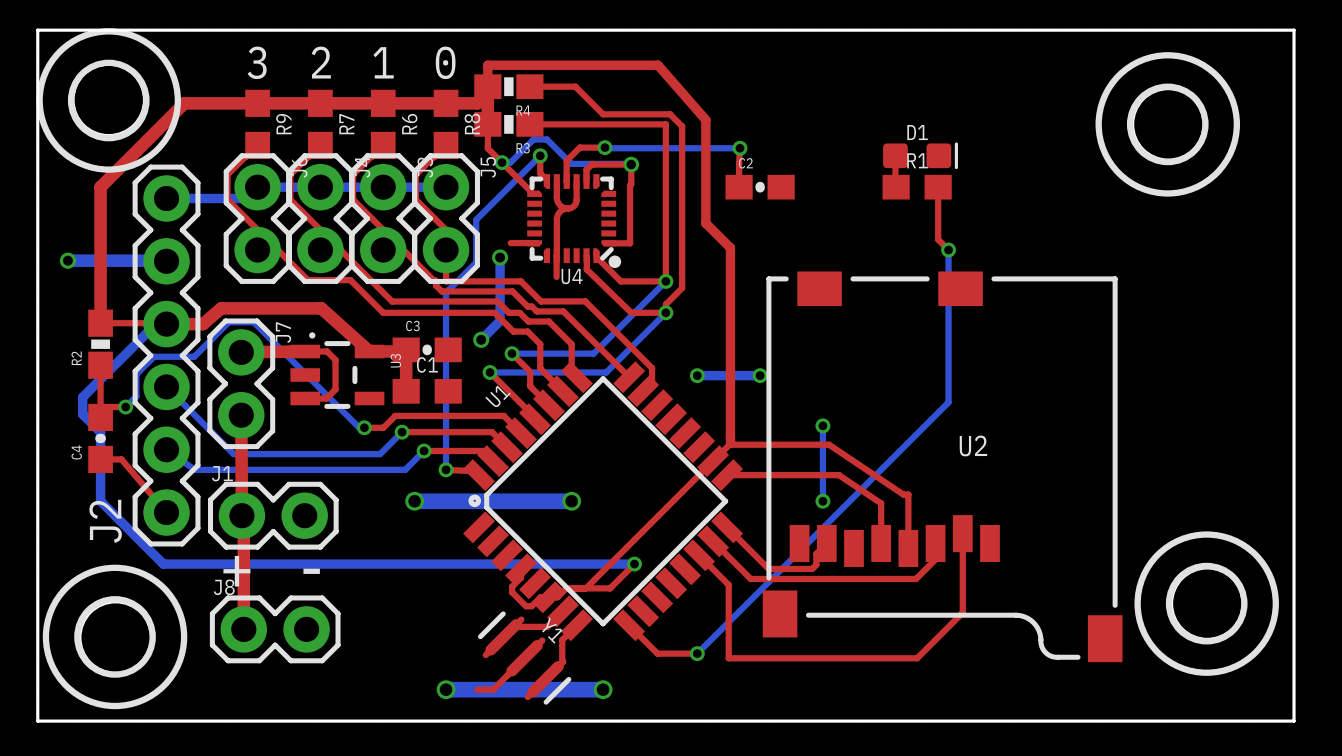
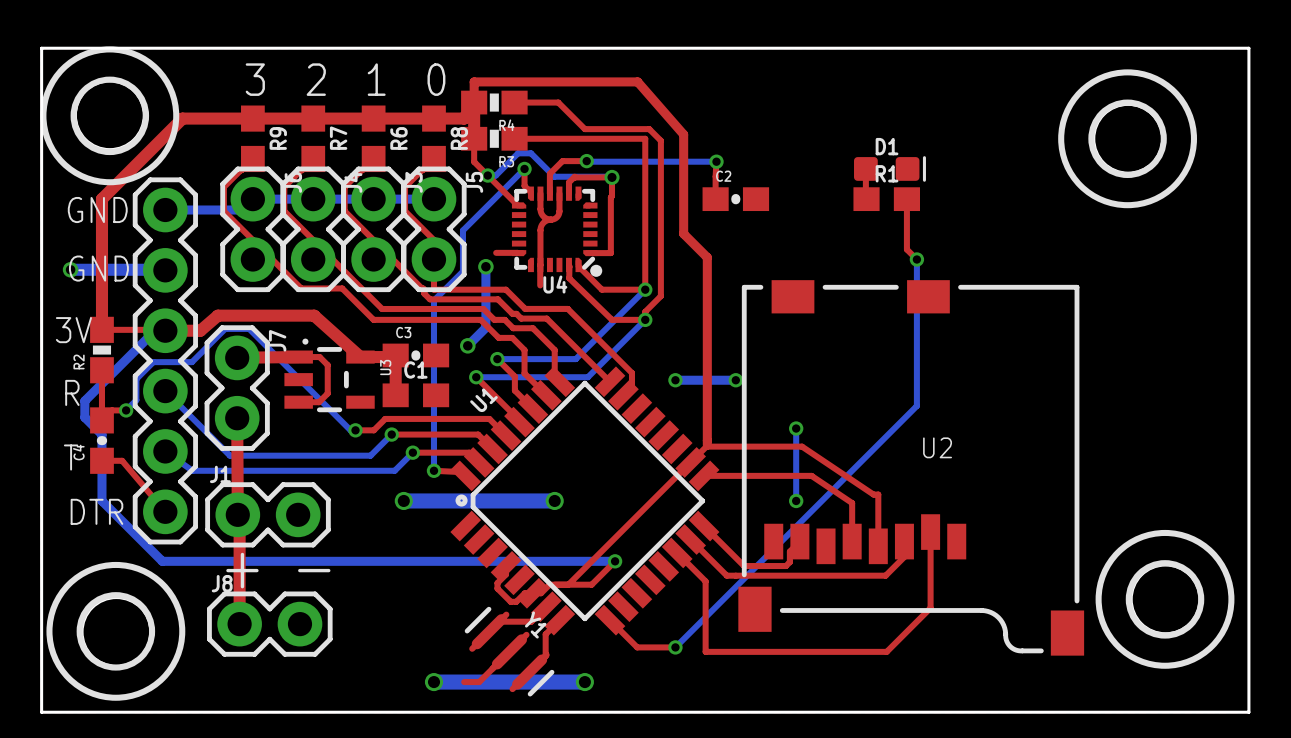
text: none -> GND (97, 210)
text: none -> GND (98, 268)
text: none -> 3V (73, 330)
text: none -> R (72, 392)
text: none -> T (71, 457)
text: none -> DTR (96, 511)
J2 name: J2 (105, 521) -> none

